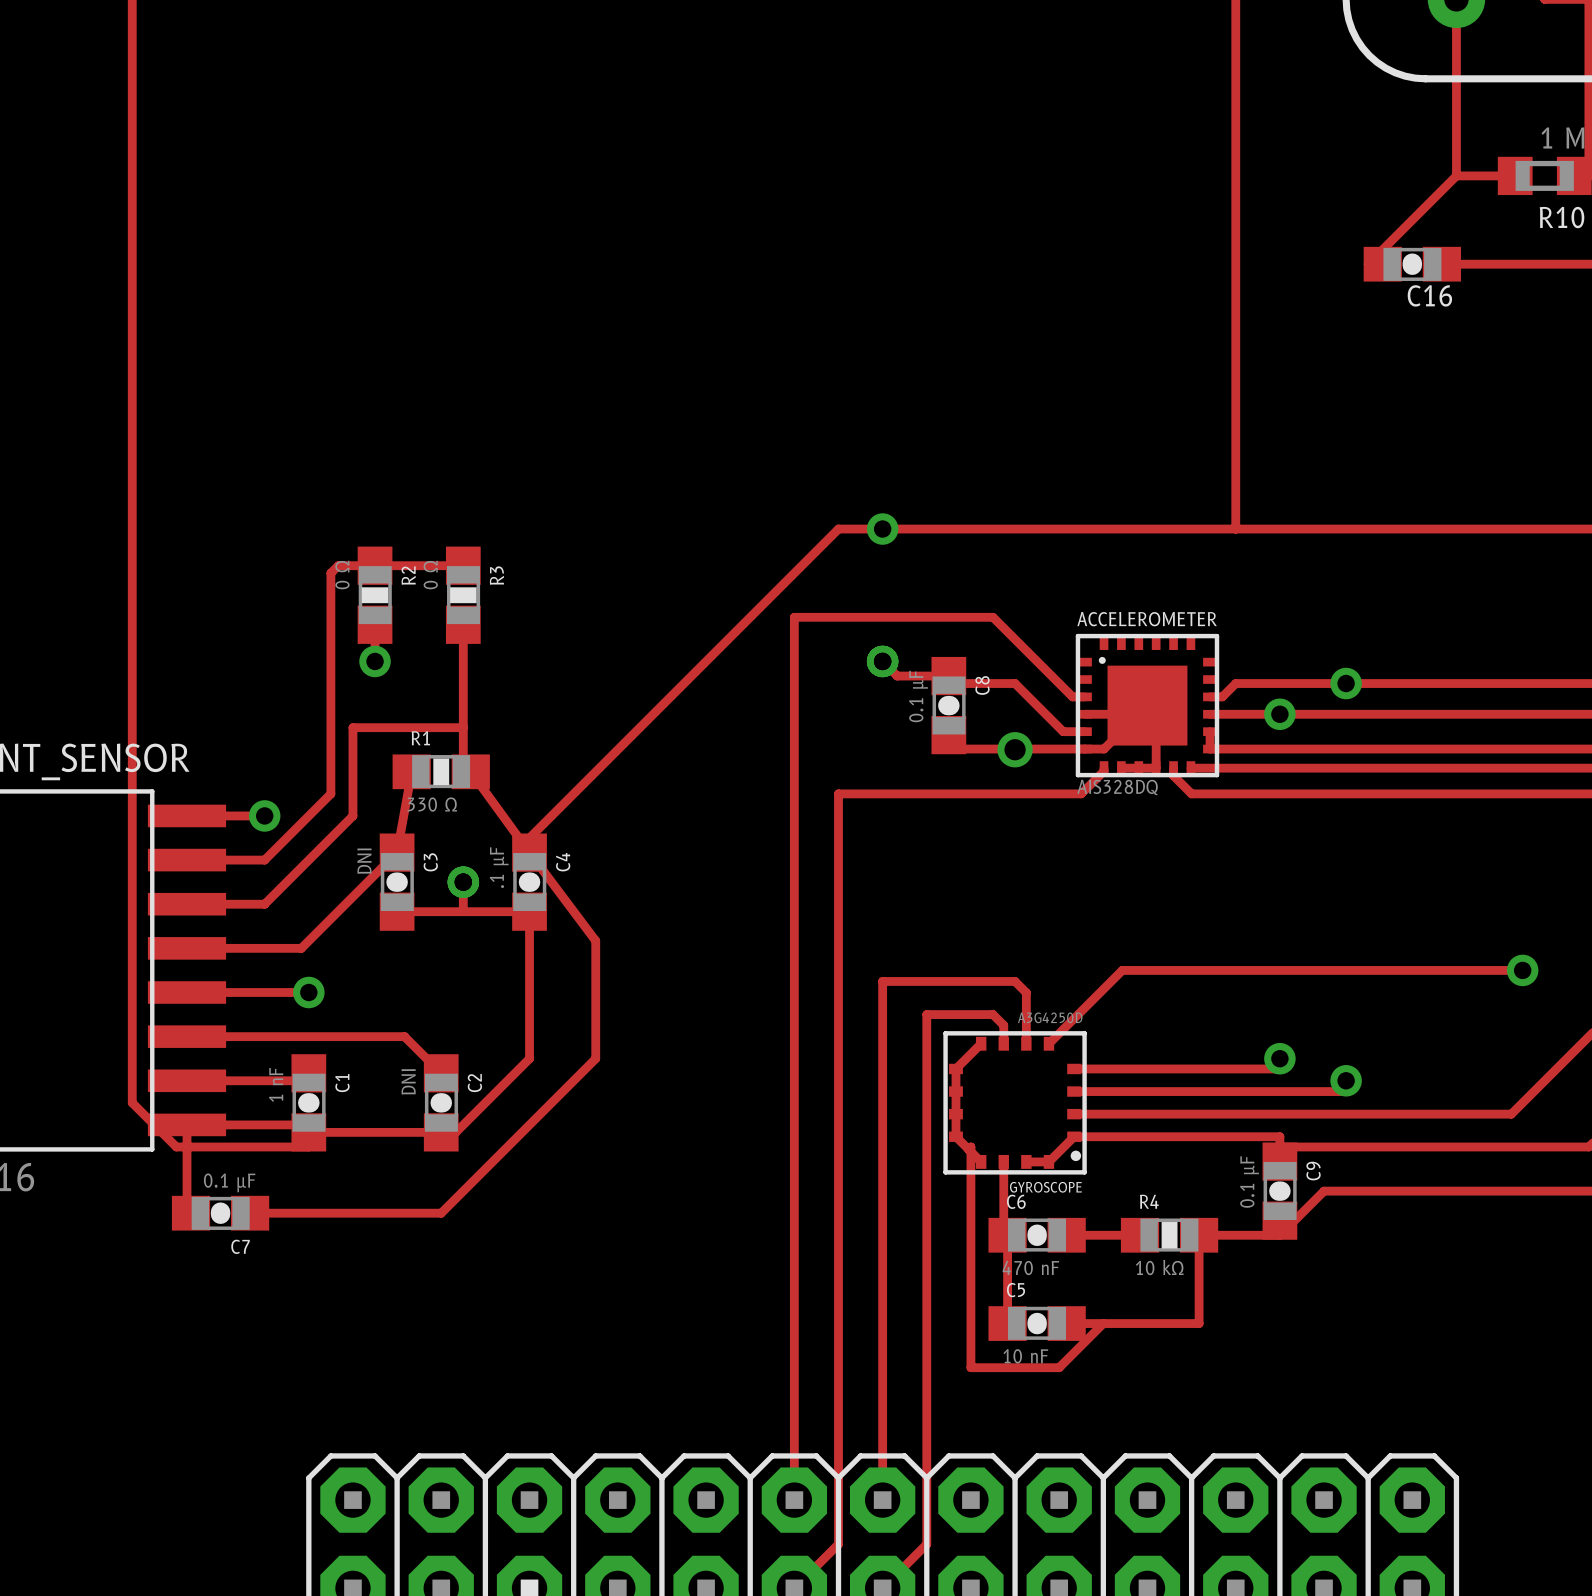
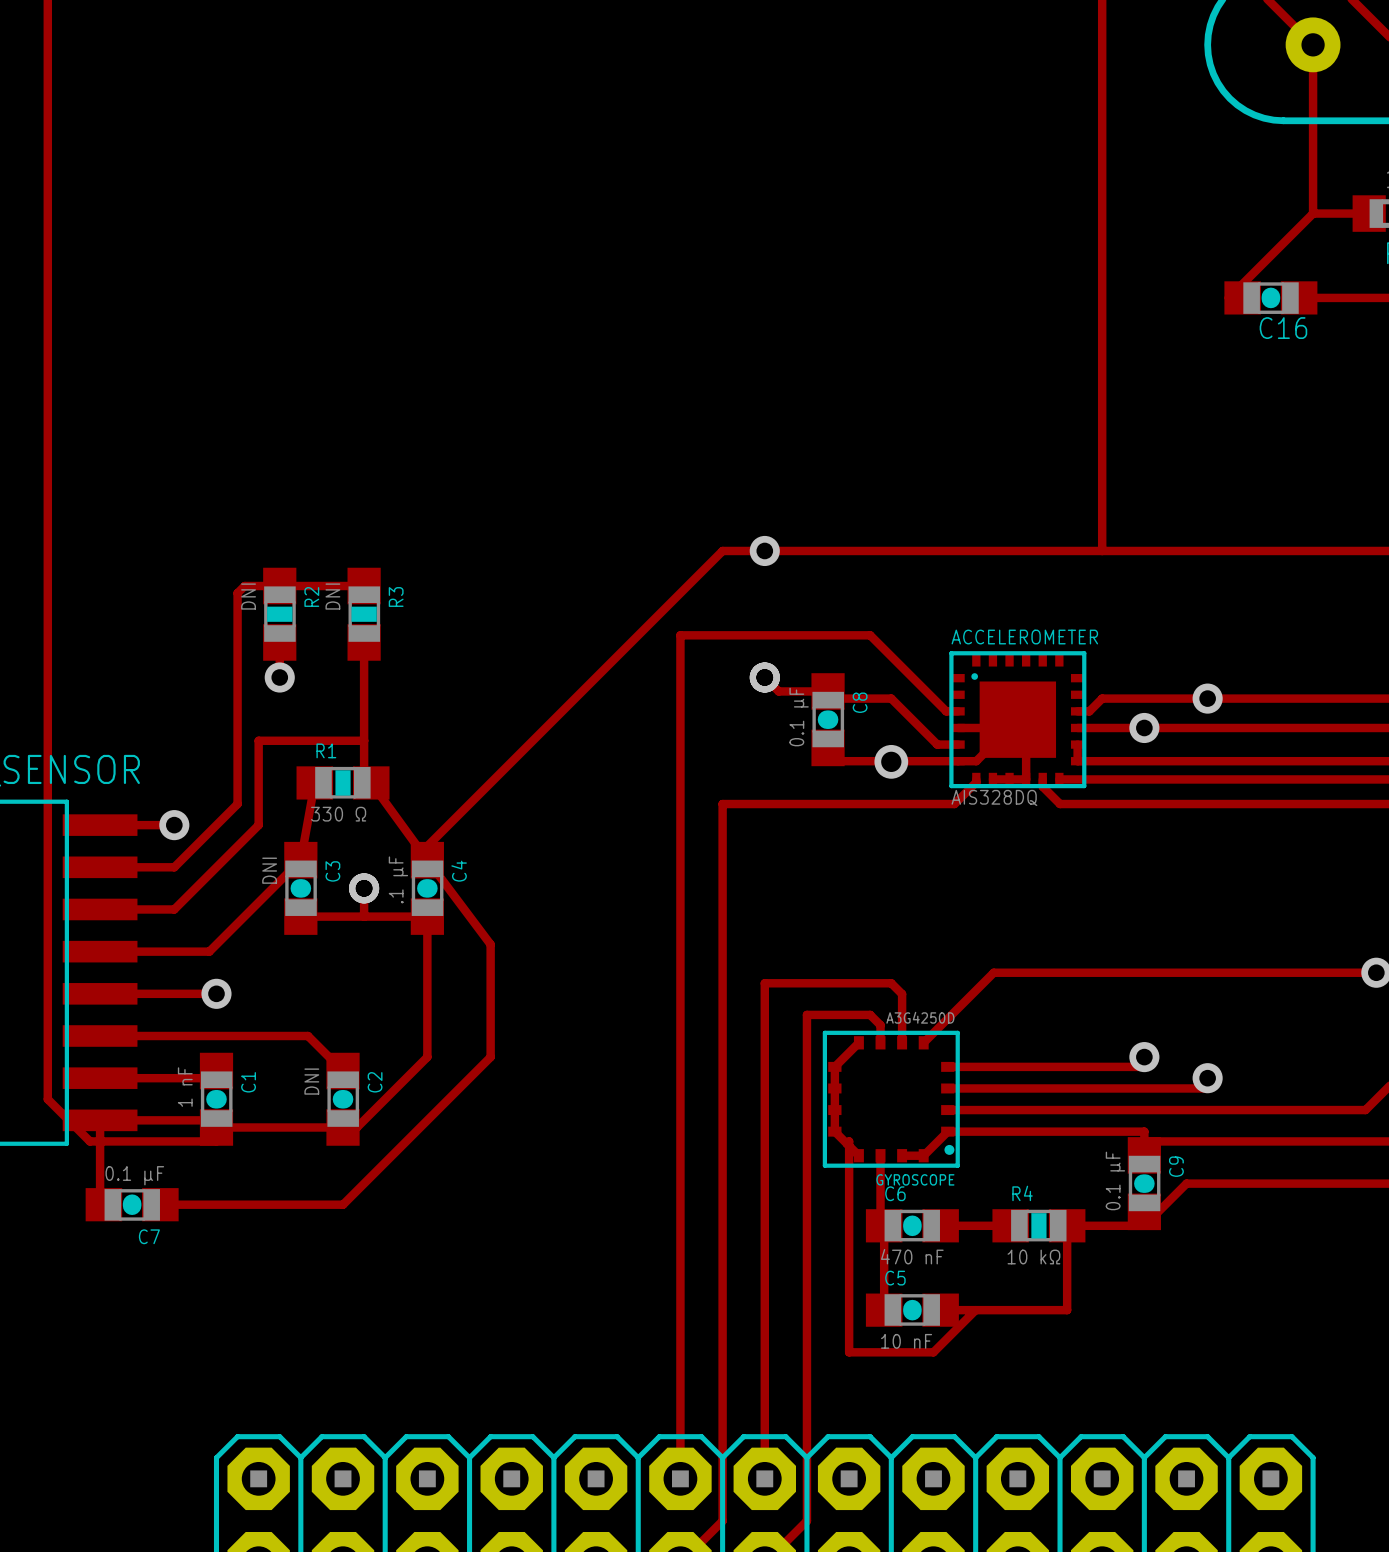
R2 value: 0 Ω (342, 575) -> DNI (248, 596)
R3 value: 0 Ω (430, 575) -> DNI (332, 596)

